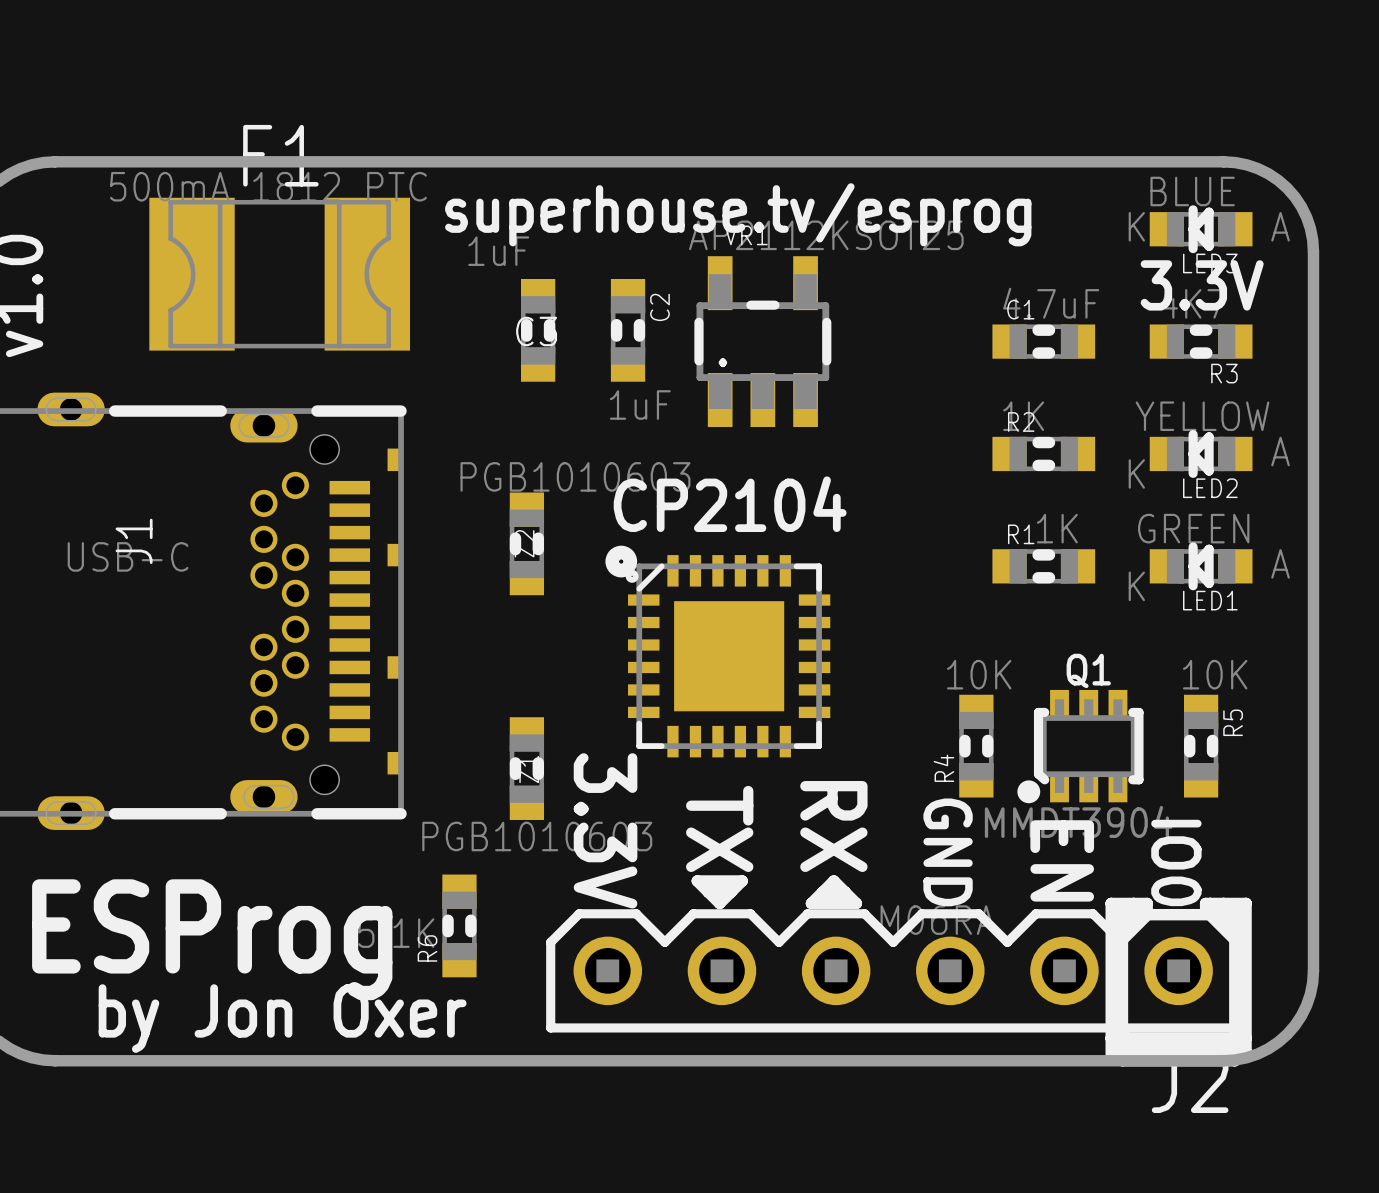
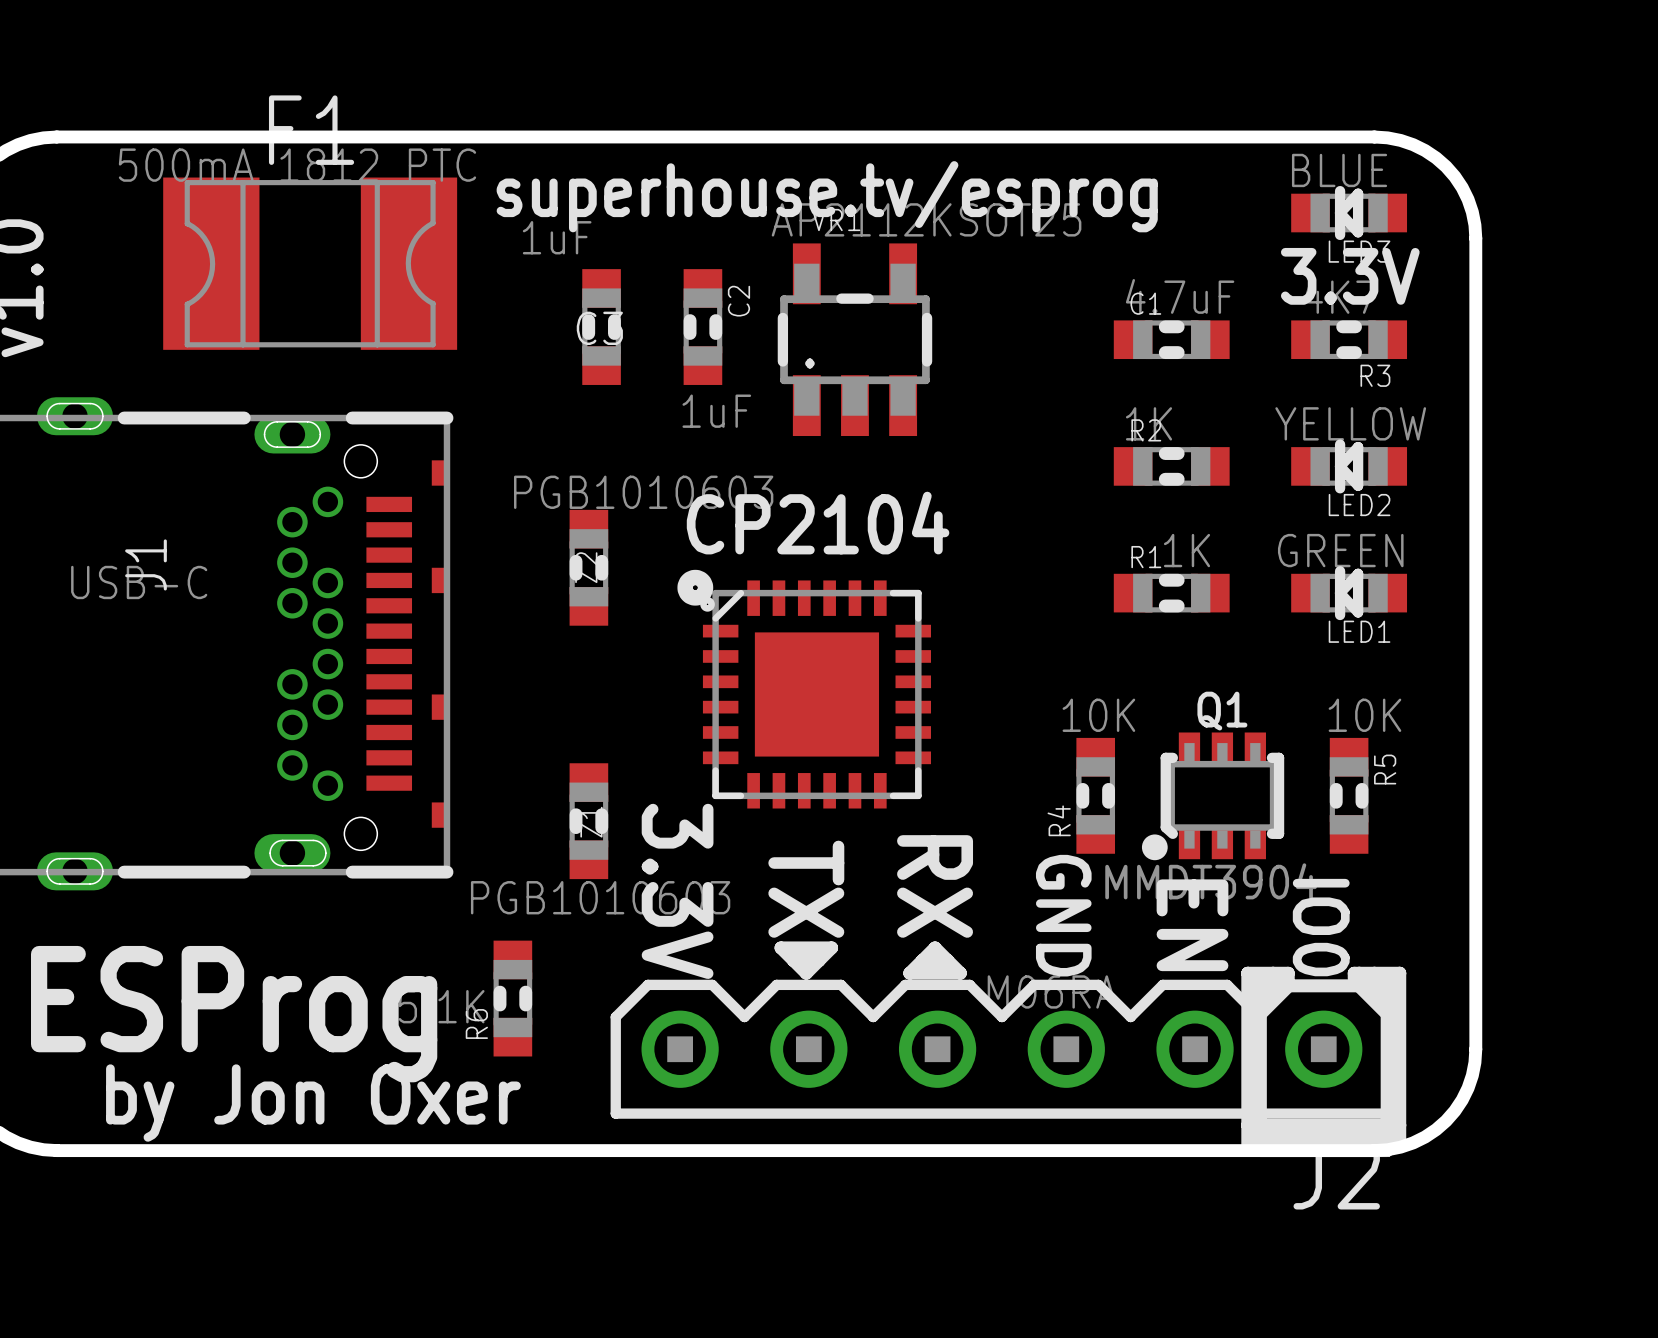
text: K (1136, 226) -> none
text: A (1280, 226) -> none
text: A (1280, 451) -> none
text: K (1136, 473) -> none
text: A (1280, 563) -> none
text: K (1136, 586) -> none

